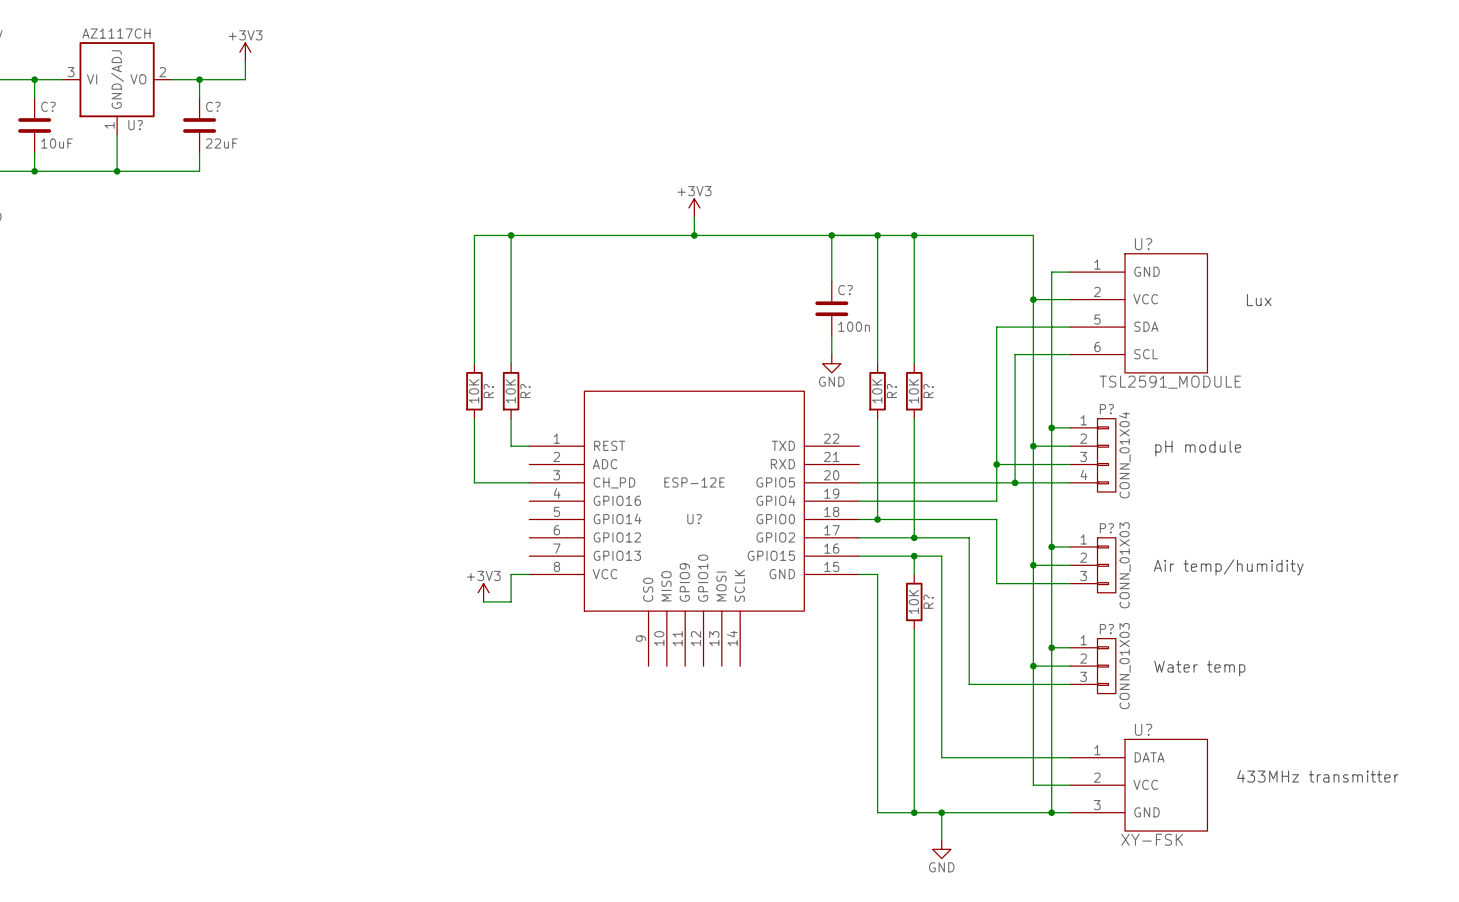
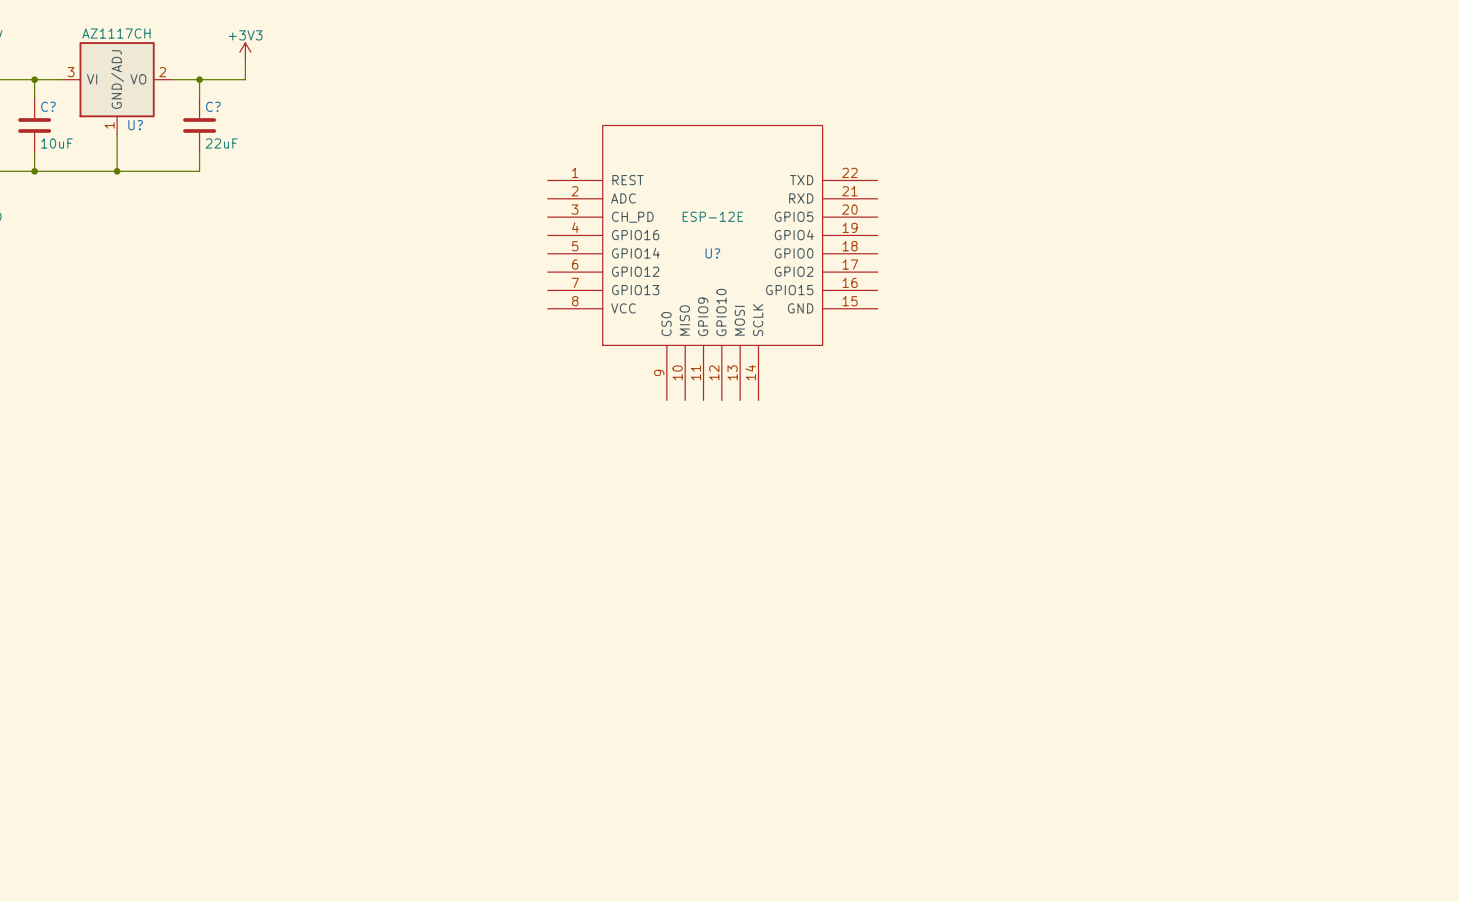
power symbol: +3V3 (694, 207) -> none
wire: (694, 217) (694, 235) -> none
wire: (511, 235) (511, 363) -> none
junction: (511, 235) -> none
junction: (694, 235) -> none
wire: (831, 235) (831, 281) -> none
junction: (831, 235) -> none
wire: (877, 235) (877, 363) -> none
junction: (877, 235) -> none
wire: (914, 235) (914, 363) -> none
junction: (914, 235) -> none
U?: none -> ESP-12E (712, 262)
wire: (1070, 272) (1051, 272) (1051, 812) -> none
wire: (1033, 299) (1070, 299) -> none
junction: (1033, 299) -> none
text: Lux (1259, 300) -> none
C?: 100n (831, 308) -> none
U?: TSL2591_MODULE (1138, 313) -> none
wire: (1070, 327) (996, 327) (996, 501) (859, 501) -> none
wire: (831, 336) (831, 354) -> none
wire: (1070, 354) (1015, 354) (1015, 482) -> none
wire: (474, 363) (474, 235) (1033, 235) (1033, 785) (1070, 785) -> none
power symbol: GND (831, 363) -> none
R?: 10K (474, 391) -> none
R?: 10K (511, 391) -> none
R?: 10K (877, 391) -> none
R?: 10K (914, 391) -> none
wire: (474, 418) (474, 482) (529, 482) -> none
wire: (511, 418) (511, 446) (529, 446) -> none
wire: (877, 418) (877, 519) -> none
wire: (914, 418) (914, 537) -> none
wire: (1051, 427) (1070, 427) -> none
junction: (1051, 427) -> none
wire: (1033, 446) (1070, 446) -> none
junction: (1033, 446) -> none
text: pH module (1198, 448) -> none
P?: CONN_01X04 (1092, 455) -> none
wire: (996, 464) (1070, 464) -> none
junction: (996, 464) -> none
wire: (859, 482) (1070, 482) -> none
junction: (1015, 482) -> none
wire: (859, 519) (996, 519) (996, 583) (1070, 583) -> none
junction: (877, 519) -> none
U?: ESP-12E (694, 528) -> none
wire: (859, 537) (969, 537) (969, 684) (1070, 684) -> none
junction: (914, 537) -> none
wire: (1051, 546) (1070, 546) -> none
junction: (1051, 546) -> none
wire: (859, 556) (941, 556) (941, 757) (1070, 757) -> none
wire: (914, 556) (914, 574) -> none
junction: (914, 556) -> none
wire: (1033, 565) (1070, 565) -> none
junction: (1033, 565) -> none
P?: CONN_01X03 (1092, 565) -> none
text: Air temp/humidity (1228, 567) -> none
wire: (529, 574) (511, 574) (511, 601) (483, 601) -> none
wire: (859, 574) (877, 574) (877, 812) (1070, 812) -> none
power symbol: +3V3 (483, 592) -> none
R?: 10K (914, 601) -> none
wire: (914, 629) (914, 812) -> none
wire: (1051, 647) (1070, 647) -> none
junction: (1051, 647) -> none
wire: (1033, 666) (1070, 666) -> none
junction: (1033, 666) -> none
P?: CONN_01X03 (1092, 666) -> none
text: Water temp (1199, 668) -> none
text: 433MHz transmitter (1317, 776) -> none
U?: XY-FSK (1138, 785) -> none
junction: (914, 812) -> none
wire: (941, 812) (941, 840) -> none
junction: (941, 812) -> none
junction: (1051, 812) -> none
power symbol: GND (941, 849) -> none

